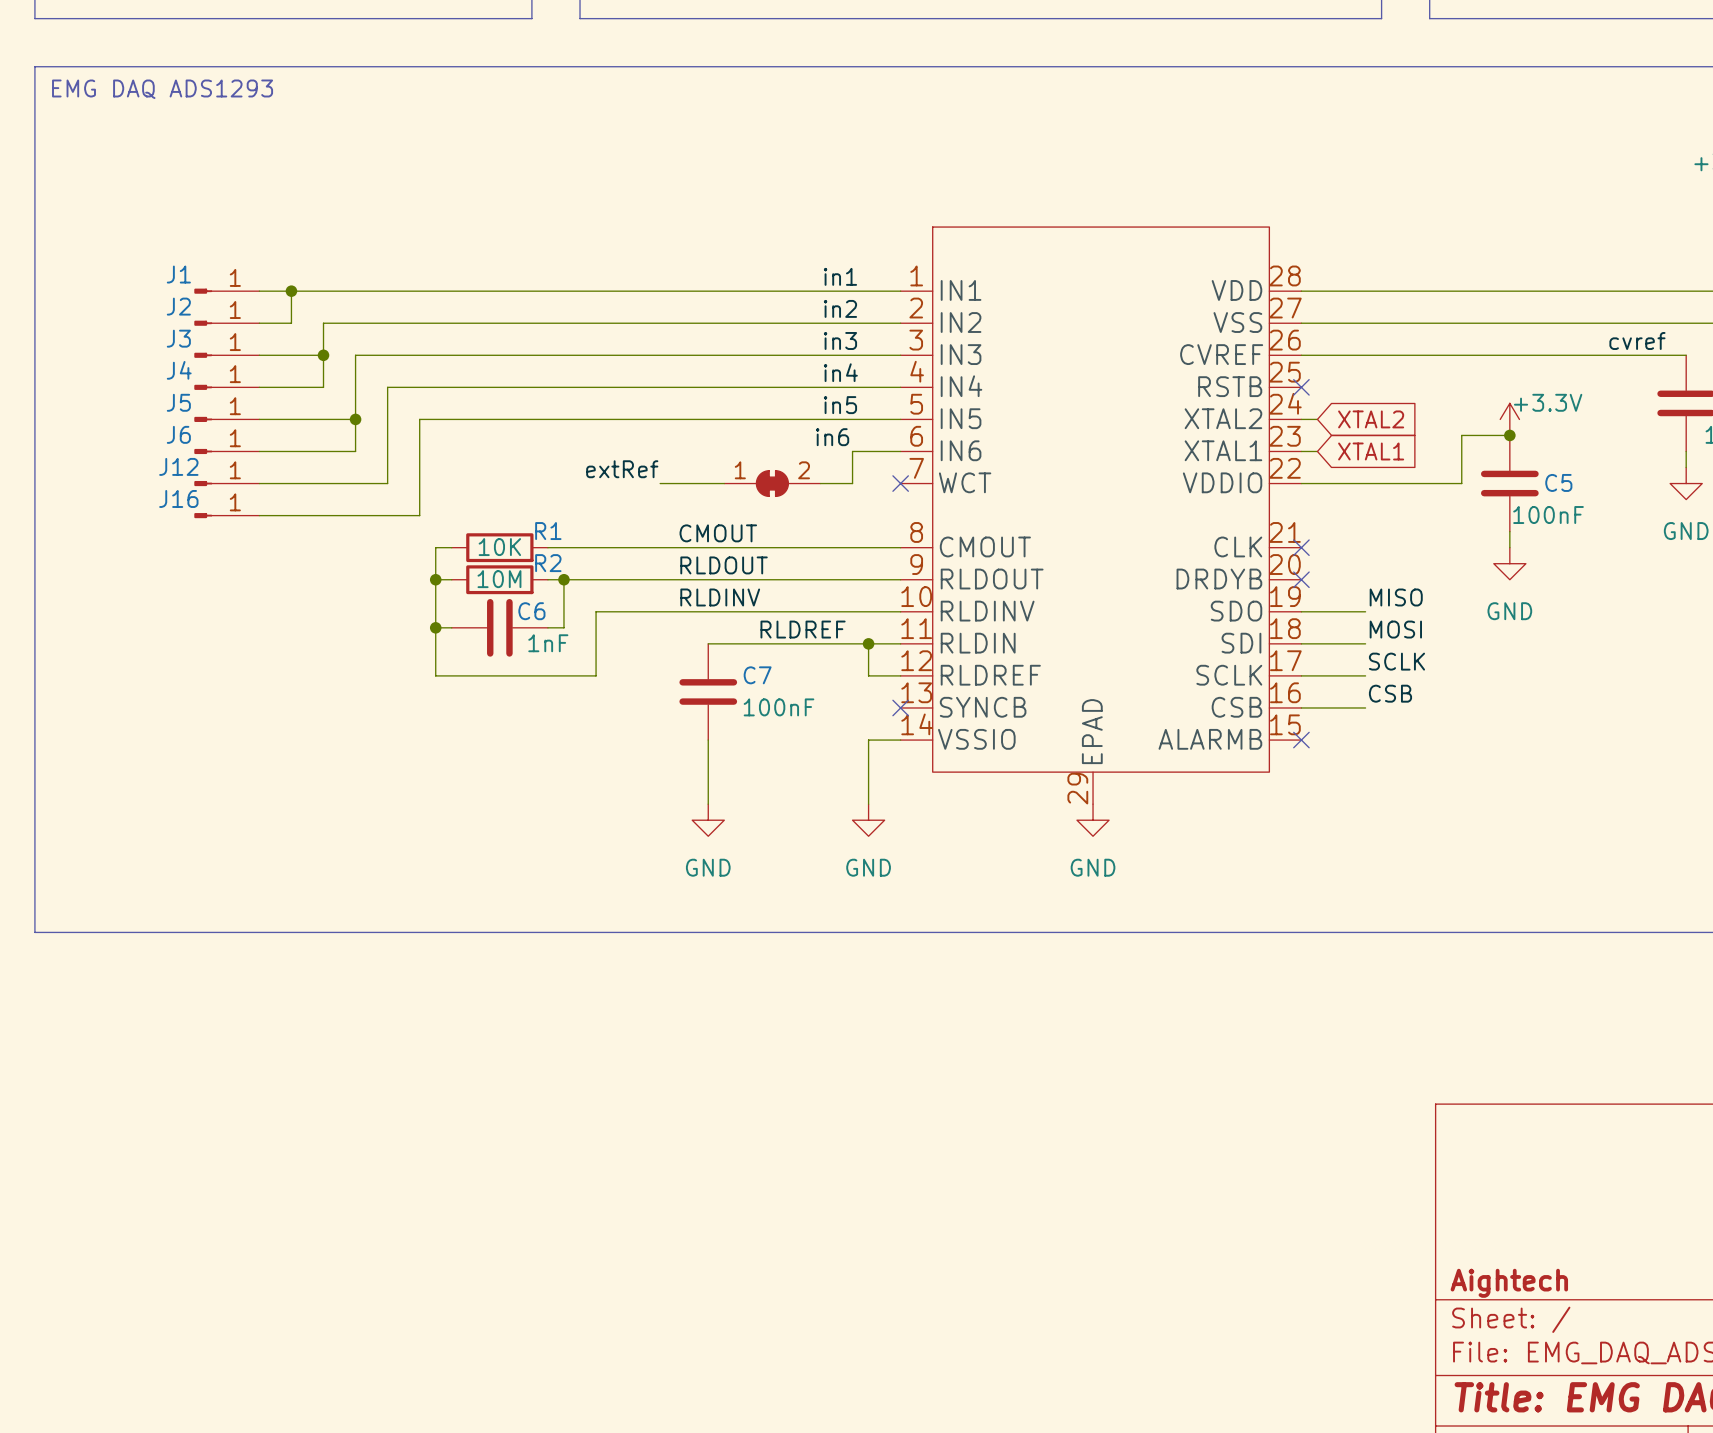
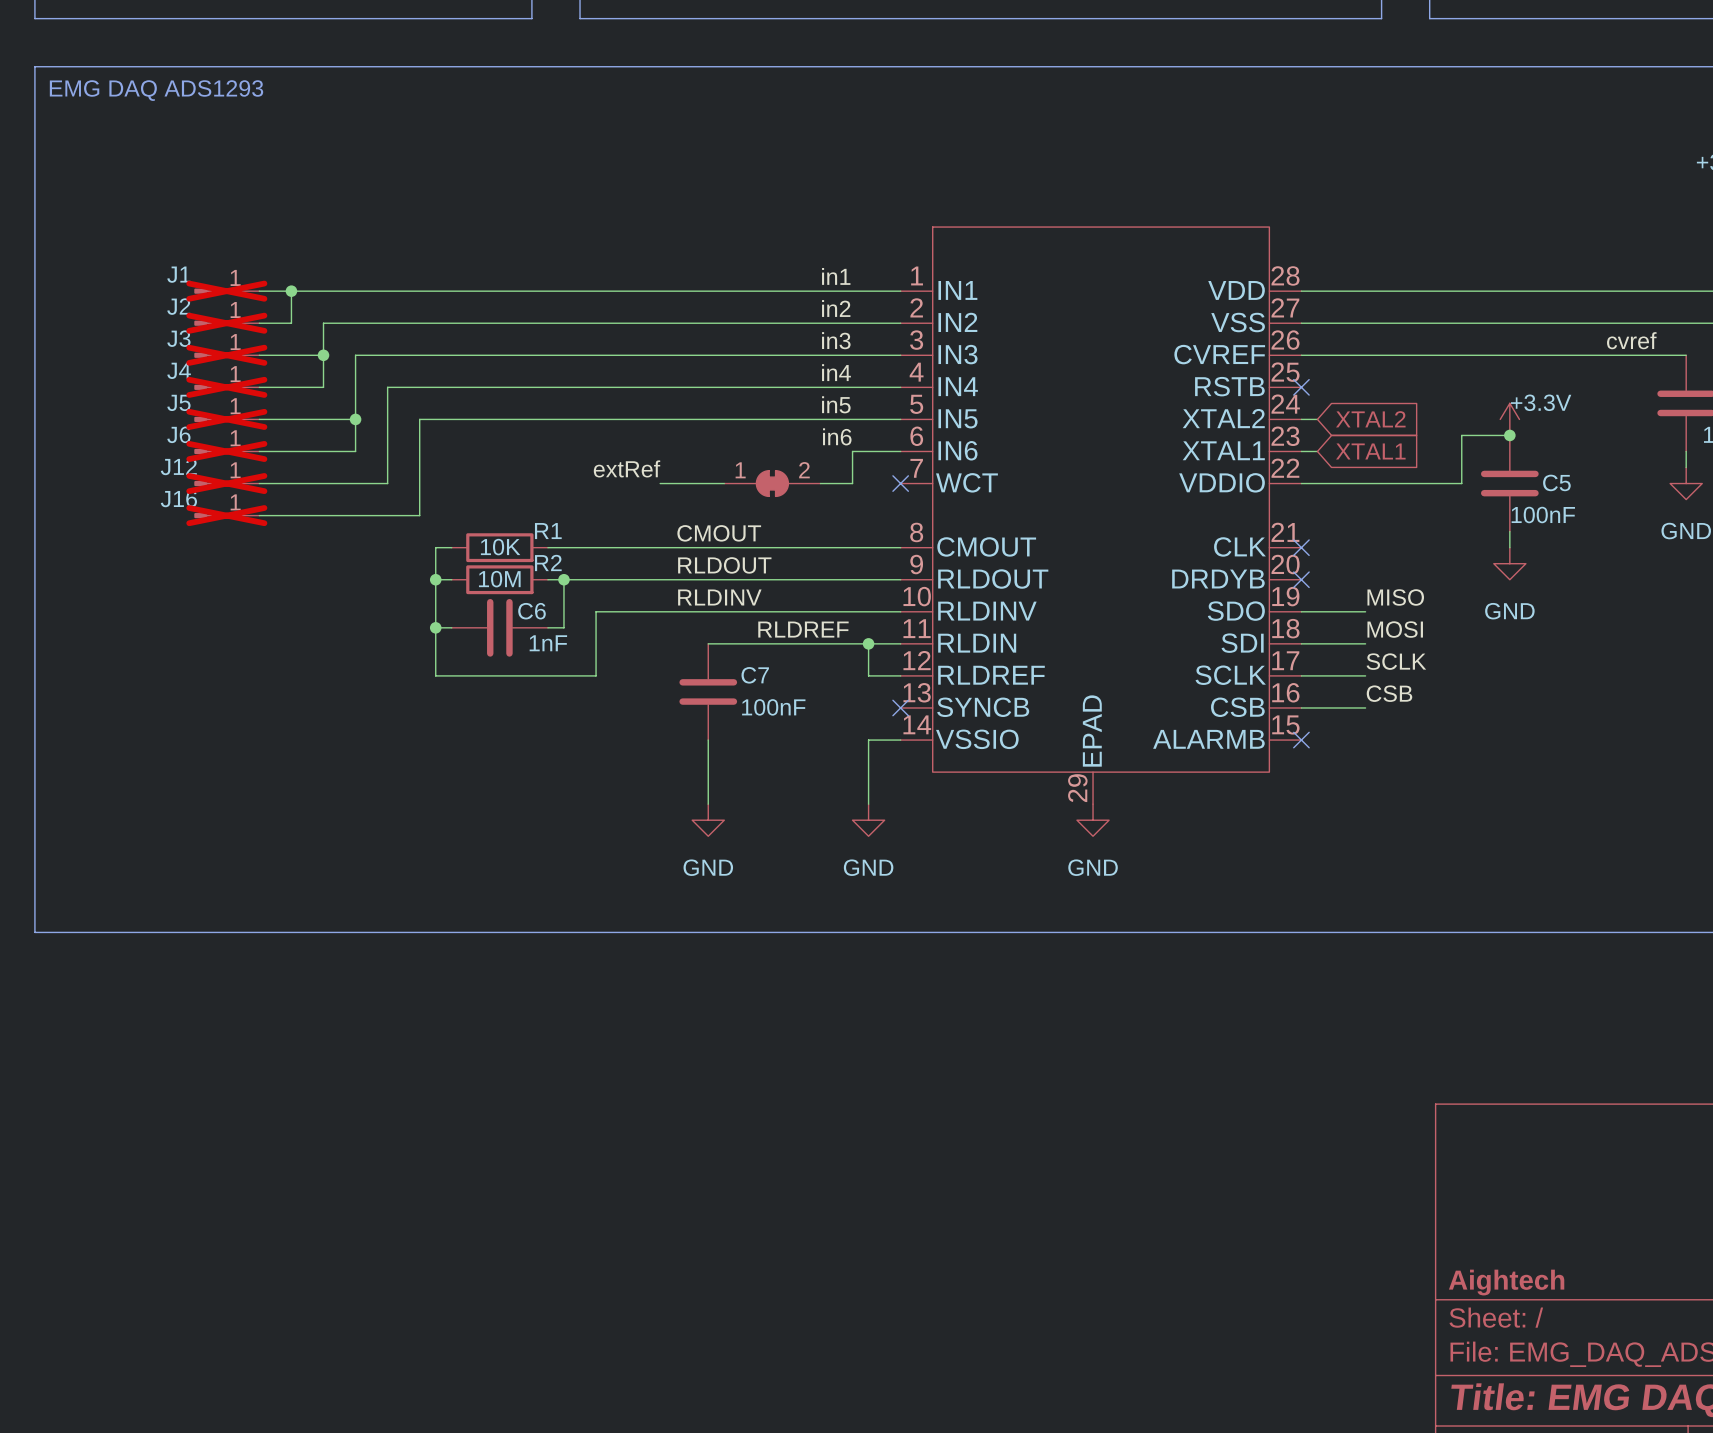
J1 do-not-place cross: none -> (226, 291)
J2 do-not-place cross: none -> (226, 323)
J3 do-not-place cross: none -> (226, 355)
J4 do-not-place cross: none -> (226, 387)
J5 do-not-place cross: none -> (226, 419)
J6 do-not-place cross: none -> (226, 451)
J12 do-not-place cross: none -> (226, 483)
J16 do-not-place cross: none -> (226, 515)

